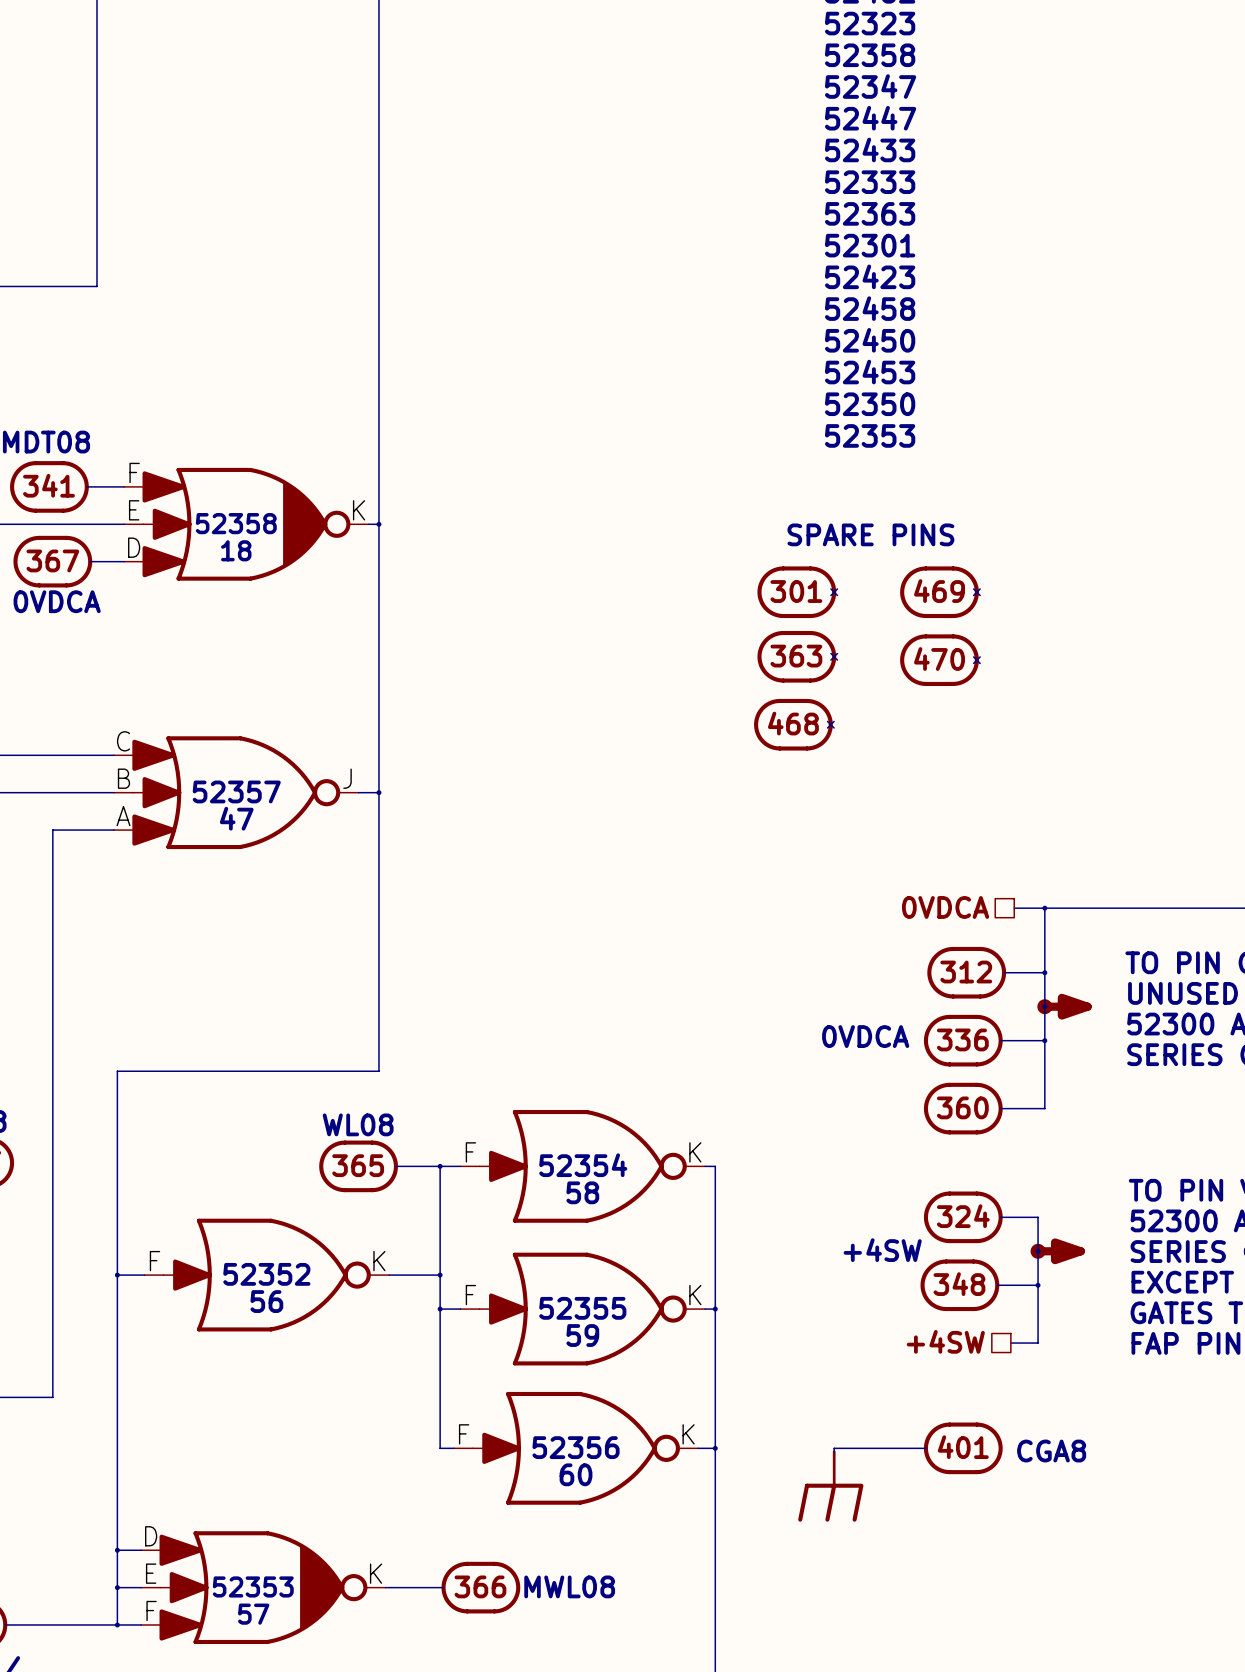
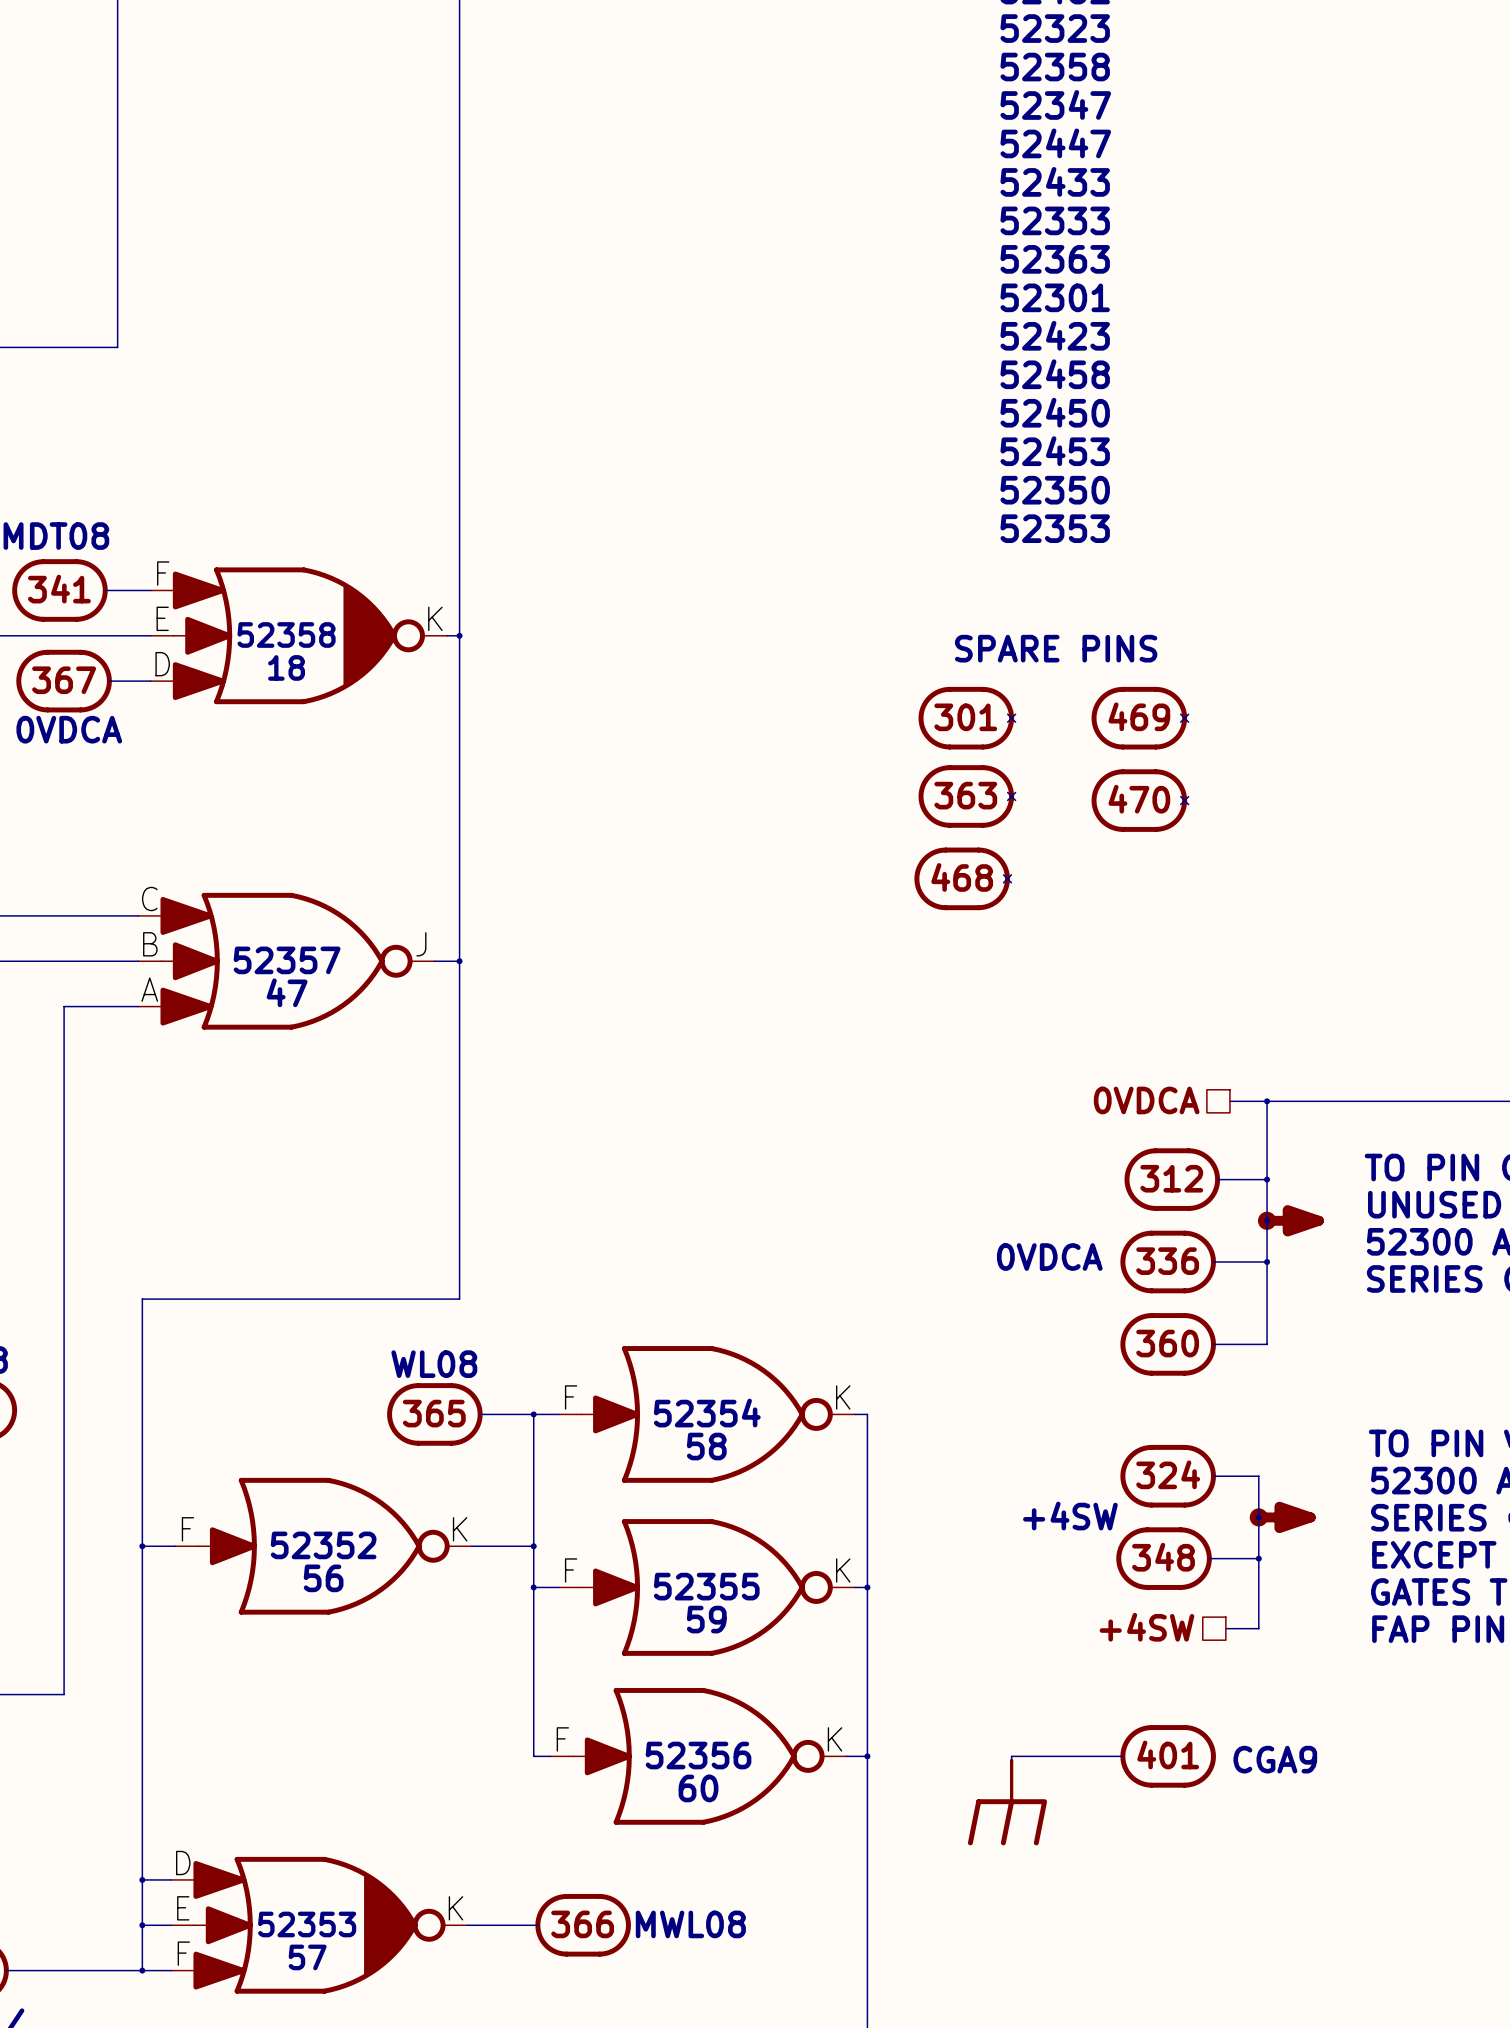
part text: CGA8 (1051, 1451) -> CGA9 (1275, 1759)

